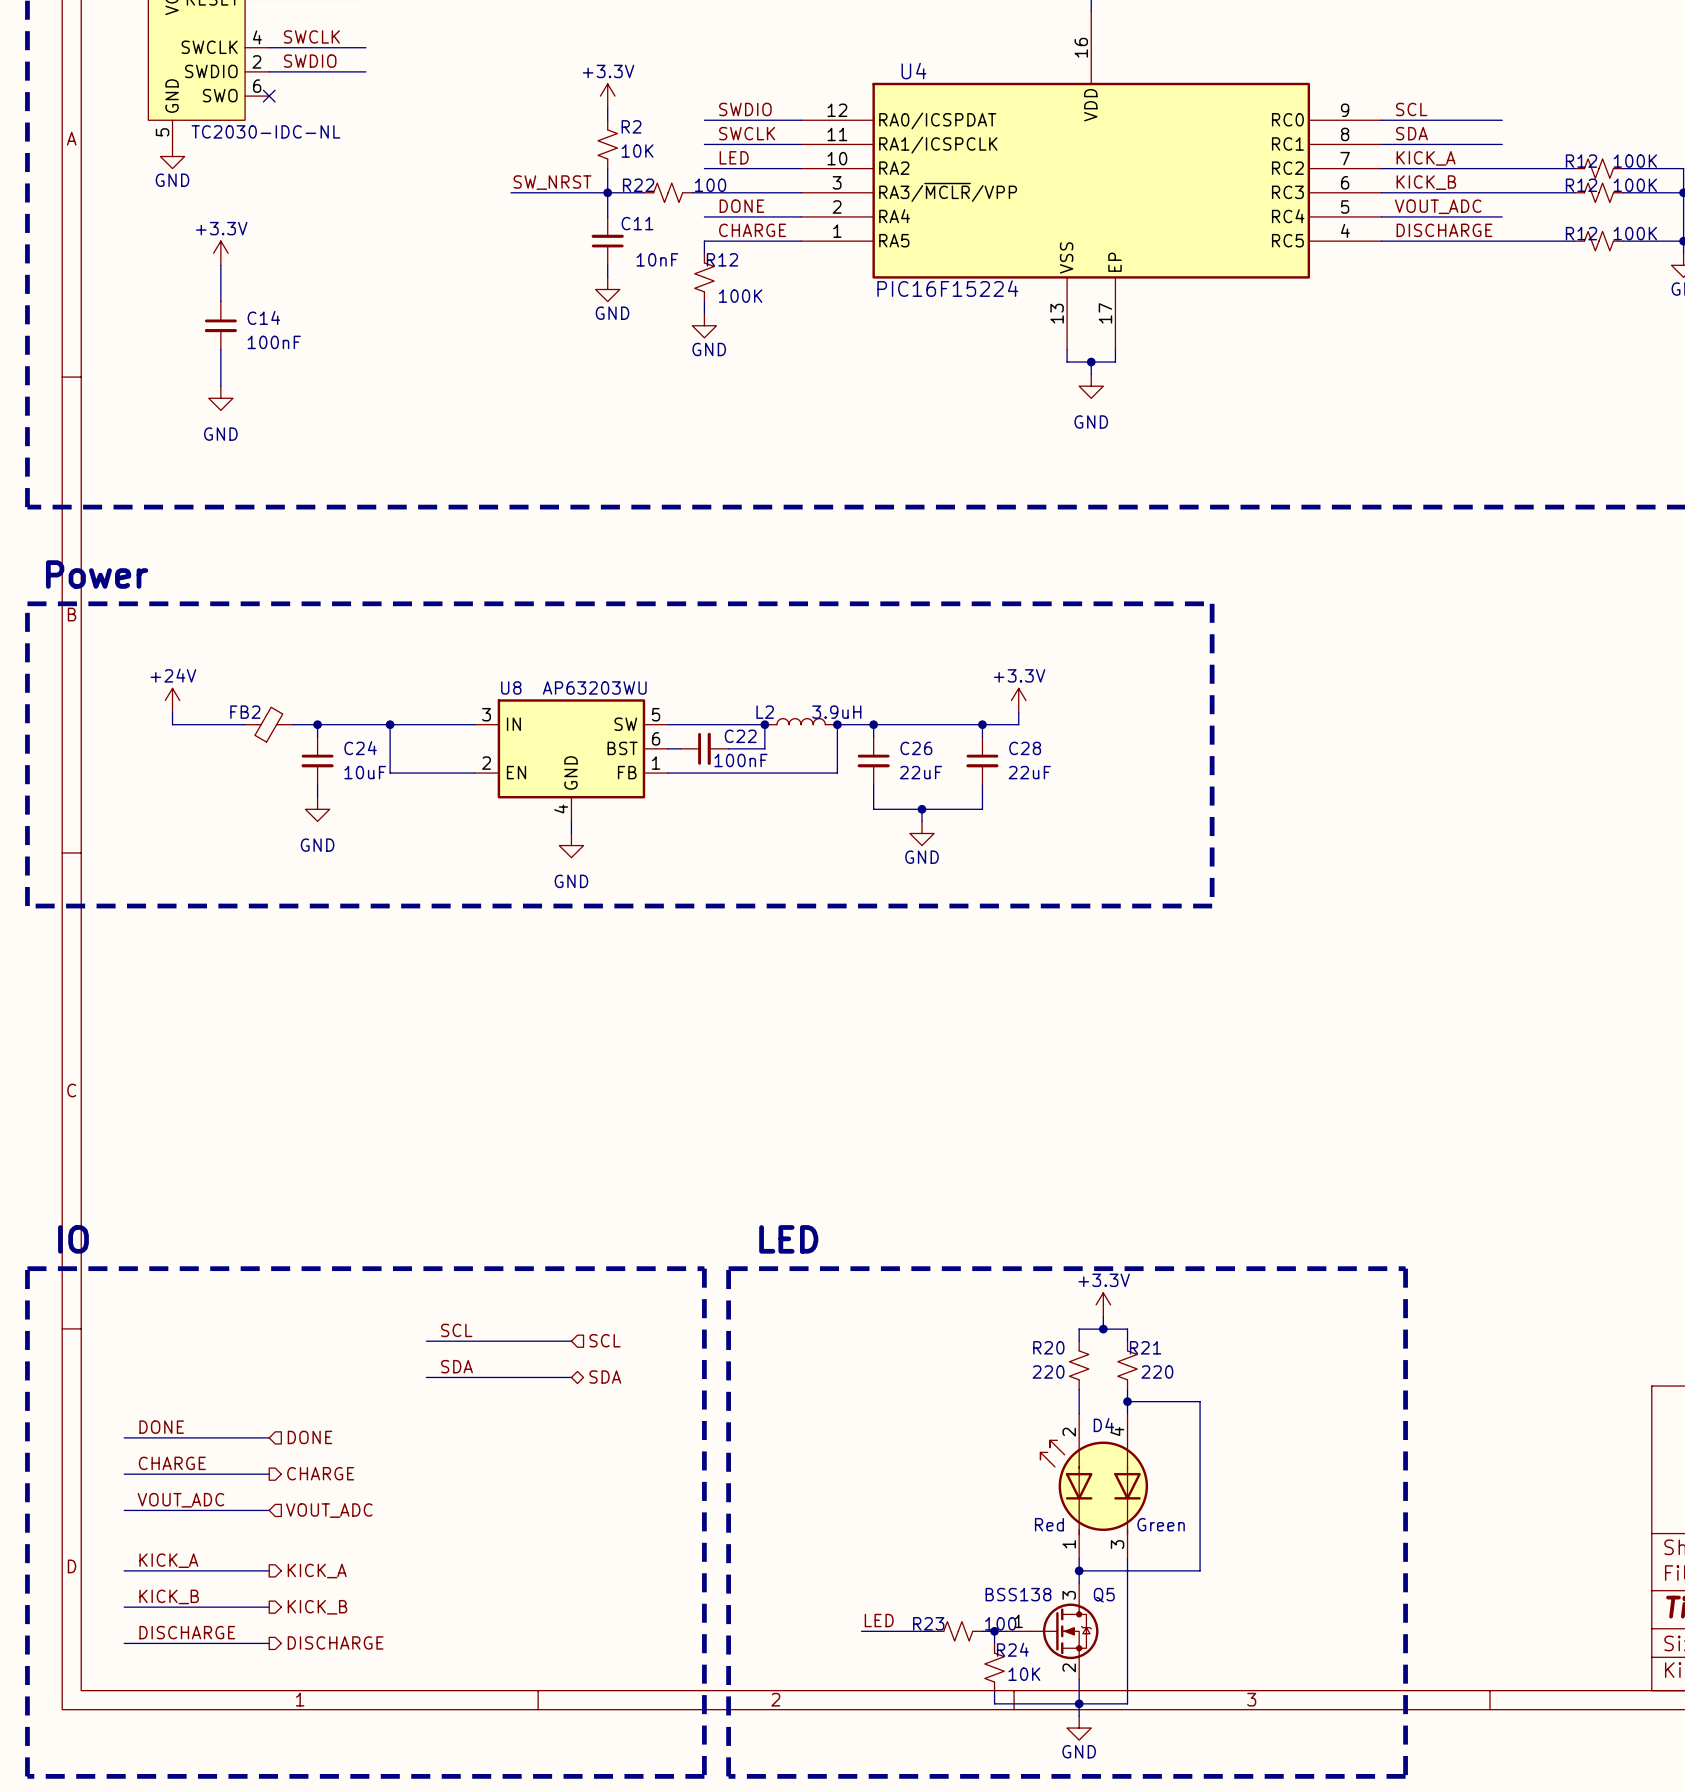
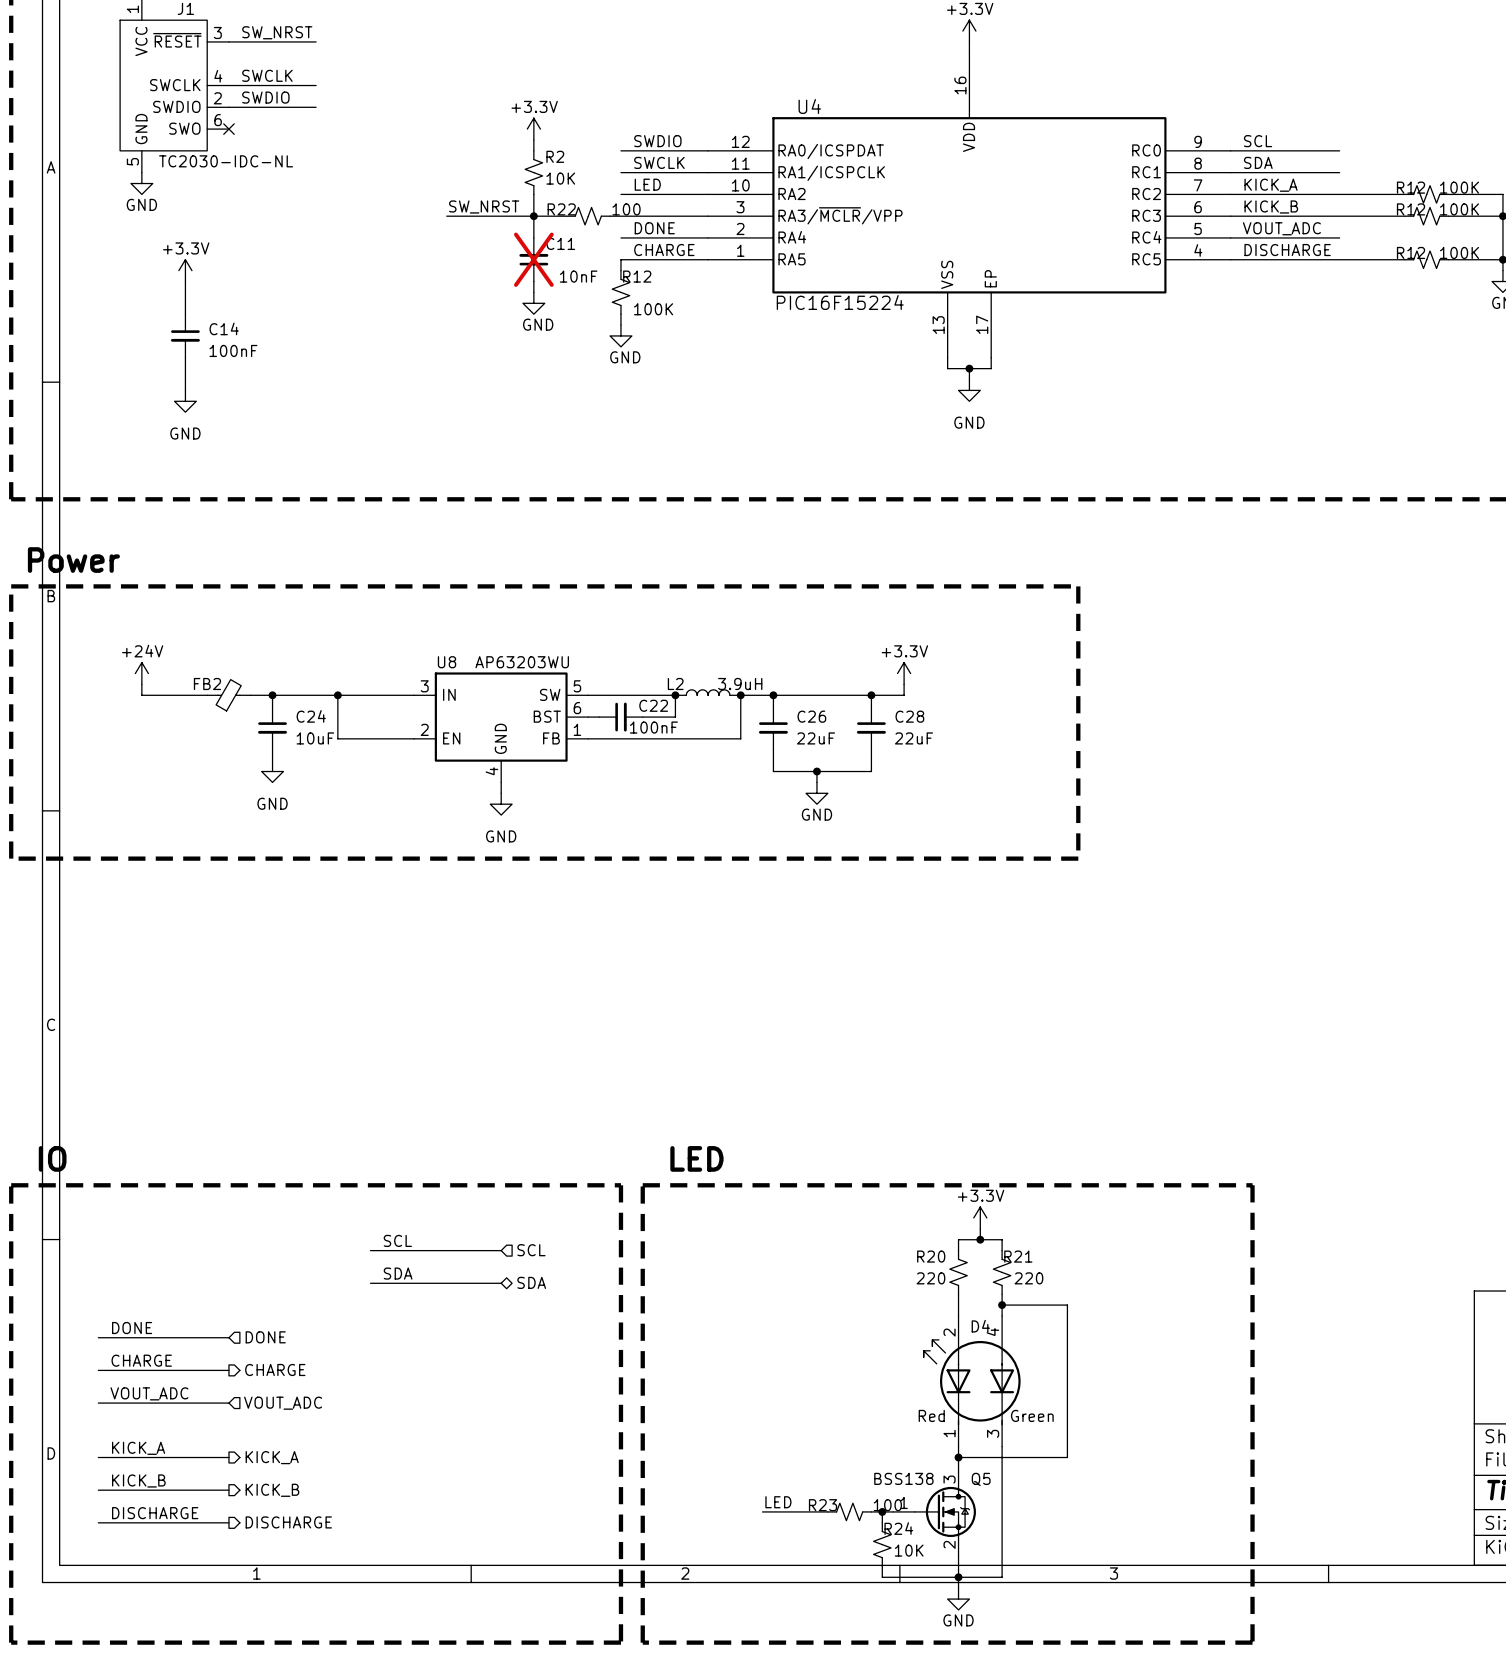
C11 do-not-place cross: none -> (533, 259)

